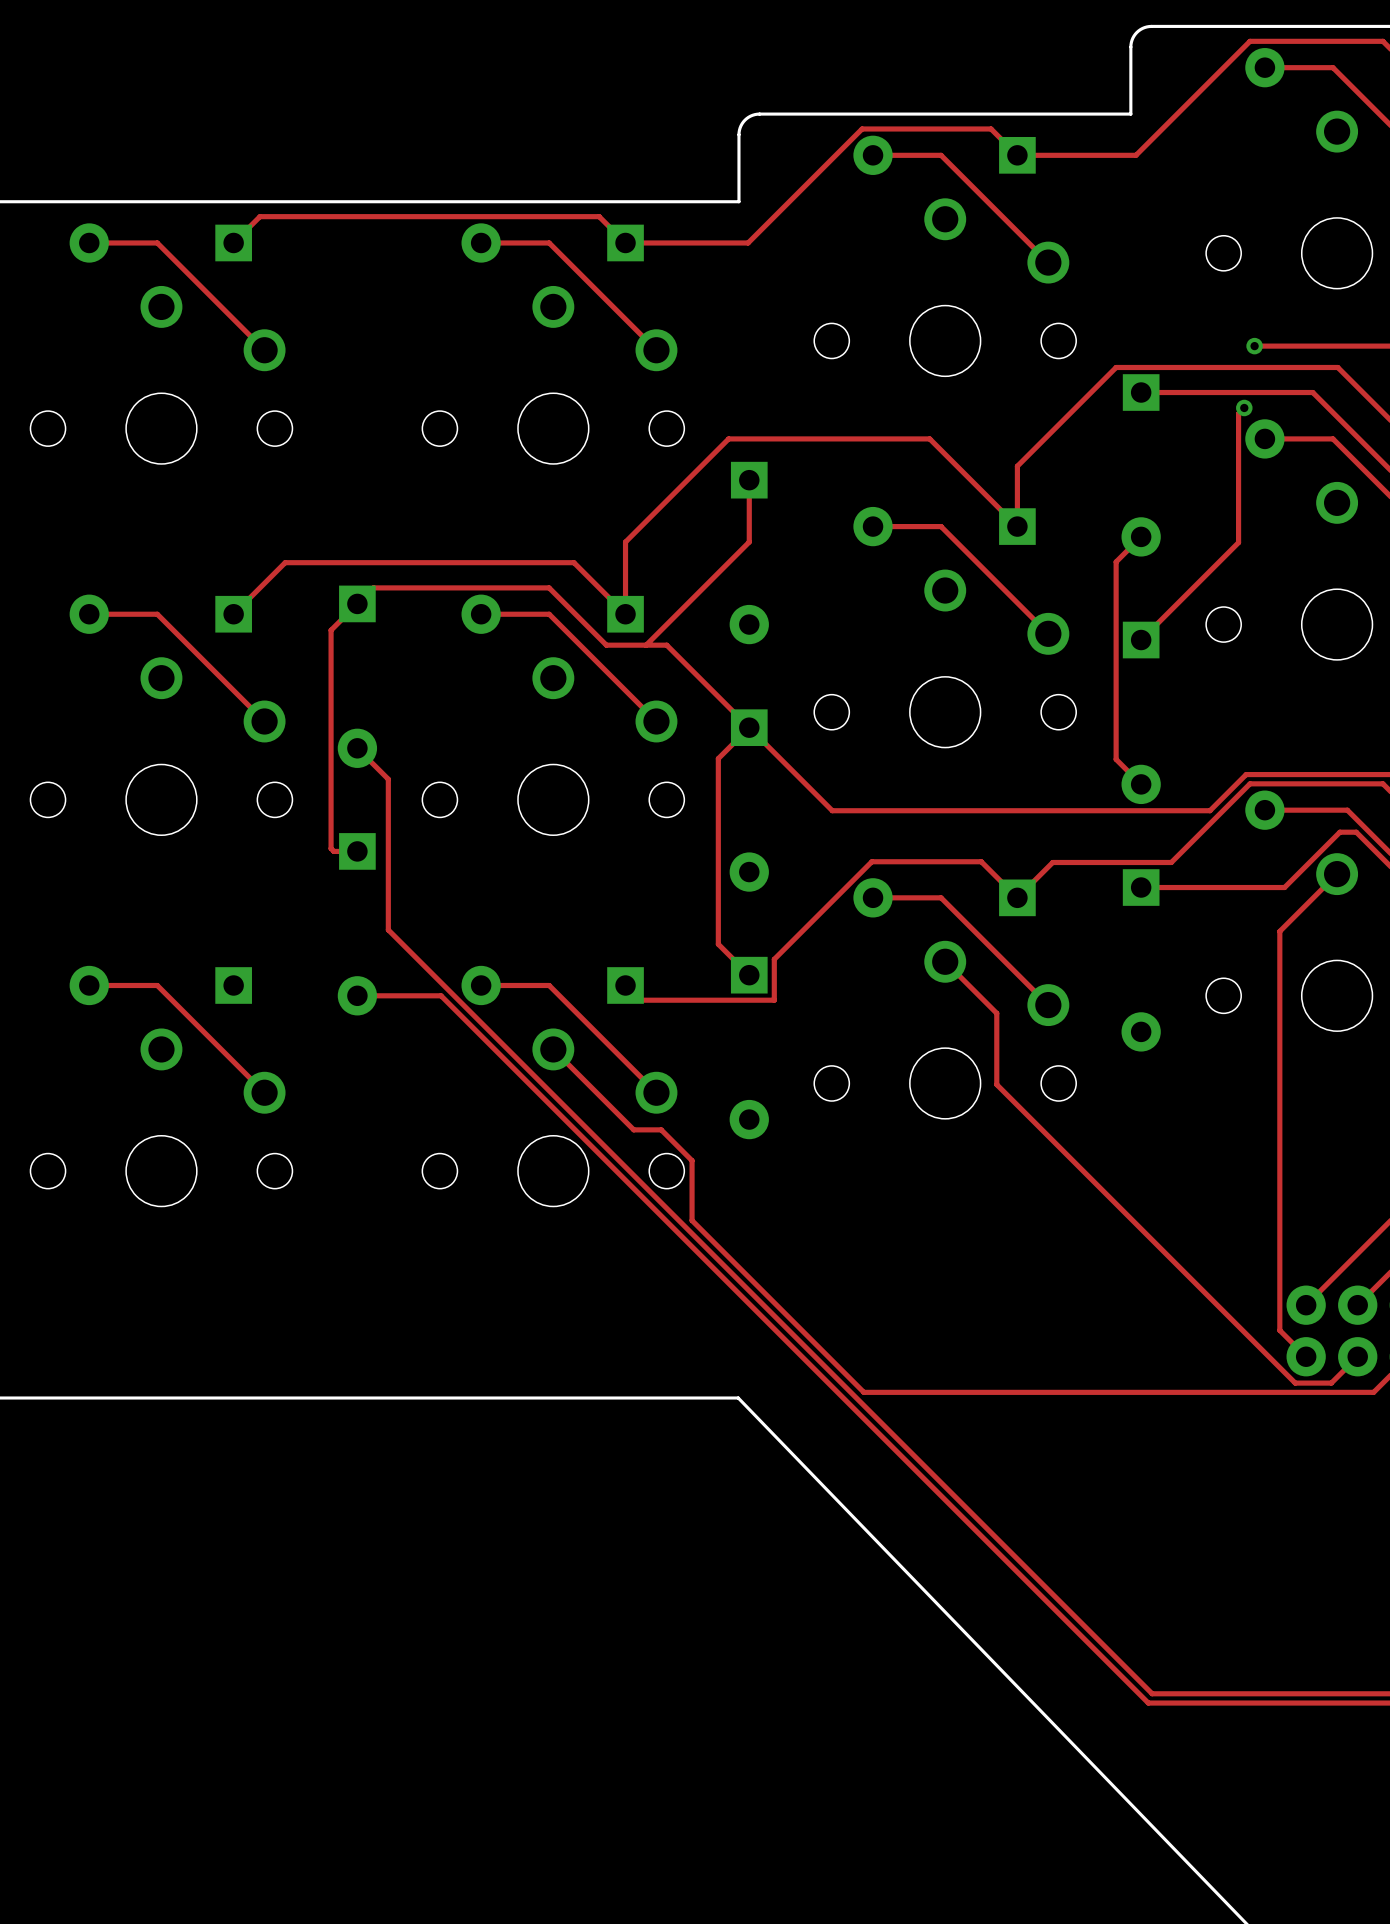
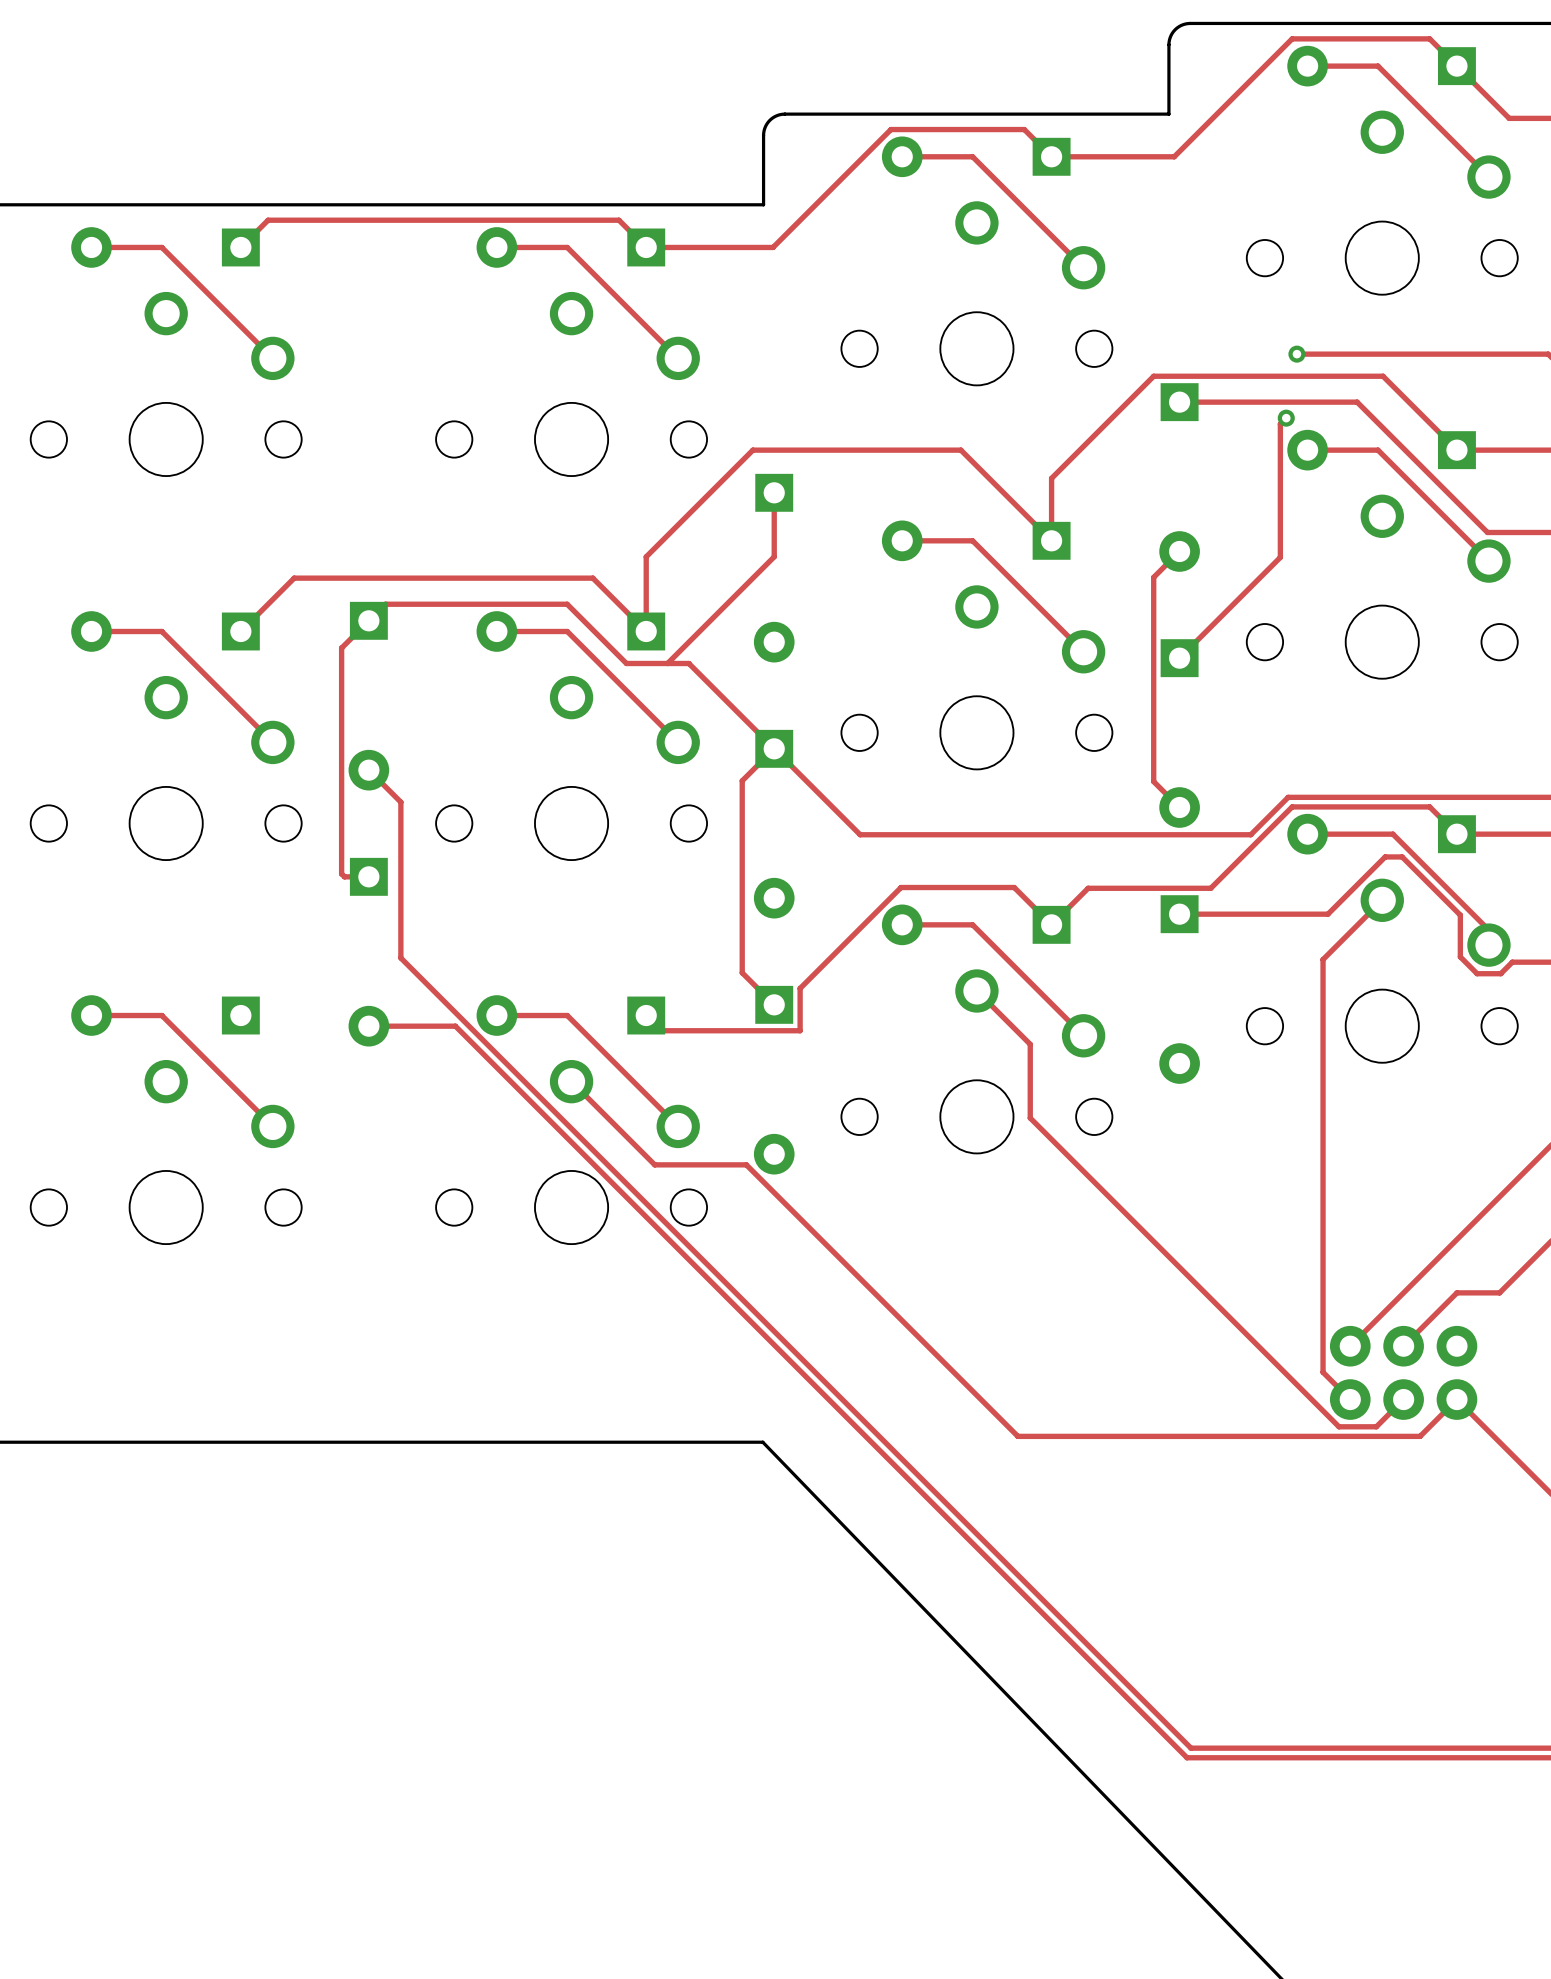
track: (661, 1129) (692, 1160) (692, 1220) (863, 1392) (984, 1392) -> (683, 1164) (746, 1164) (1017, 1436)

